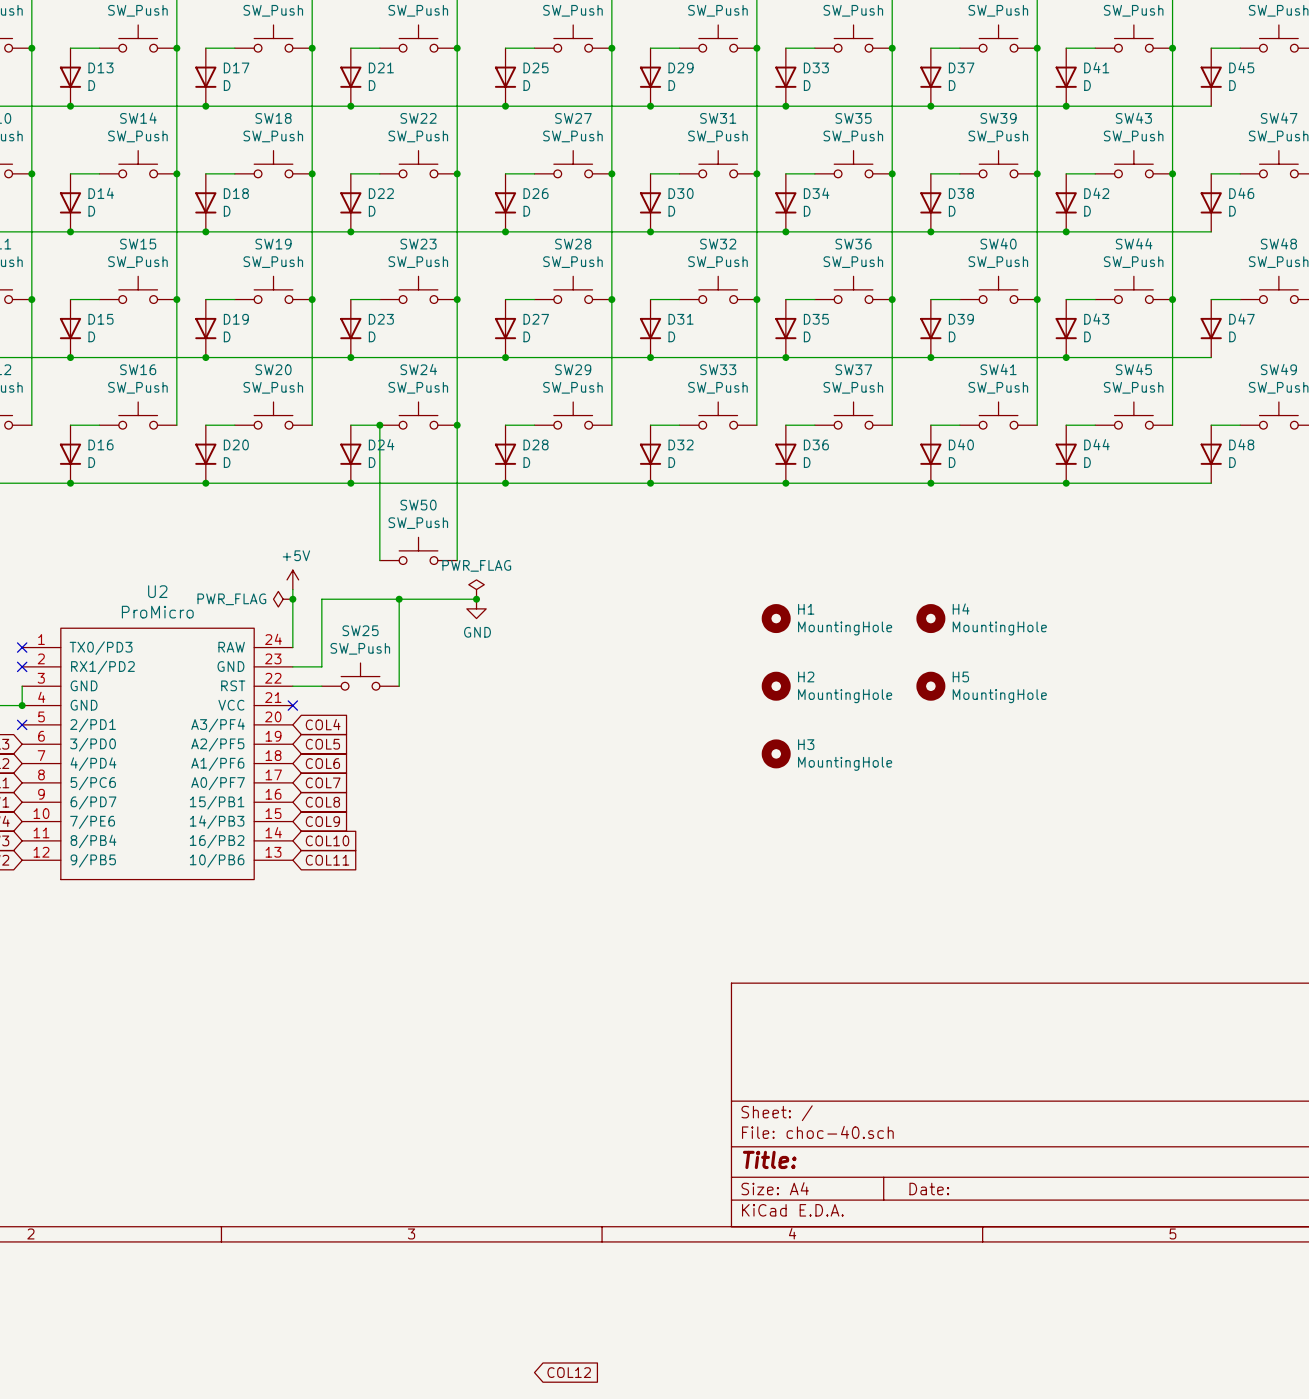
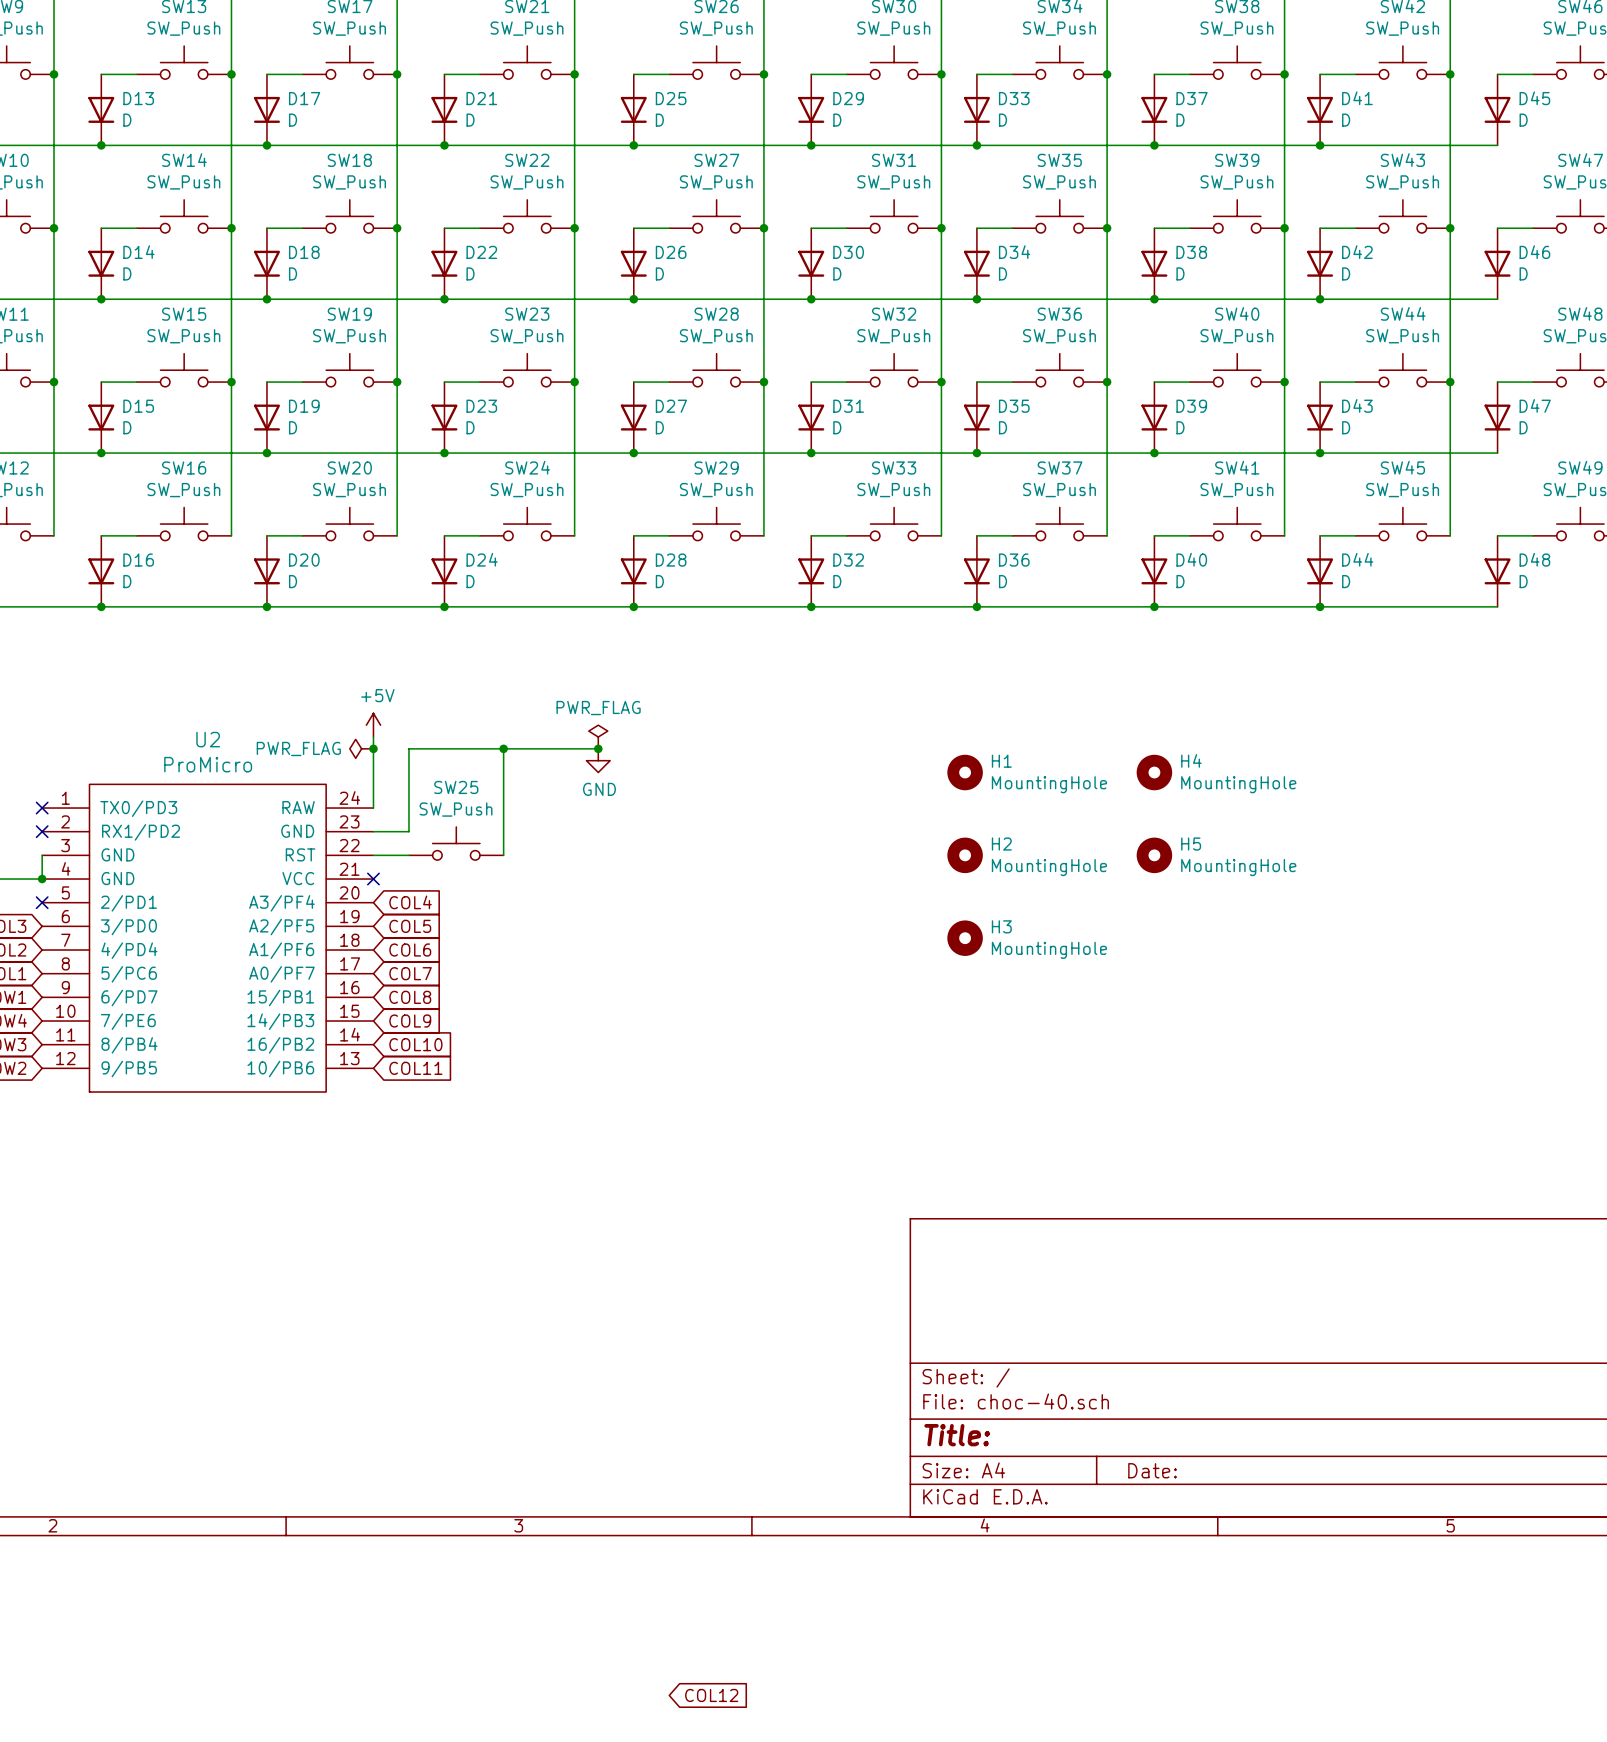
wire: (379, 425) (379, 560) -> none
junction: (379, 425) -> none
wire: (457, 425) (457, 560) -> none
junction: (457, 425) -> none
SW50: SW_Push (418, 550) -> none

